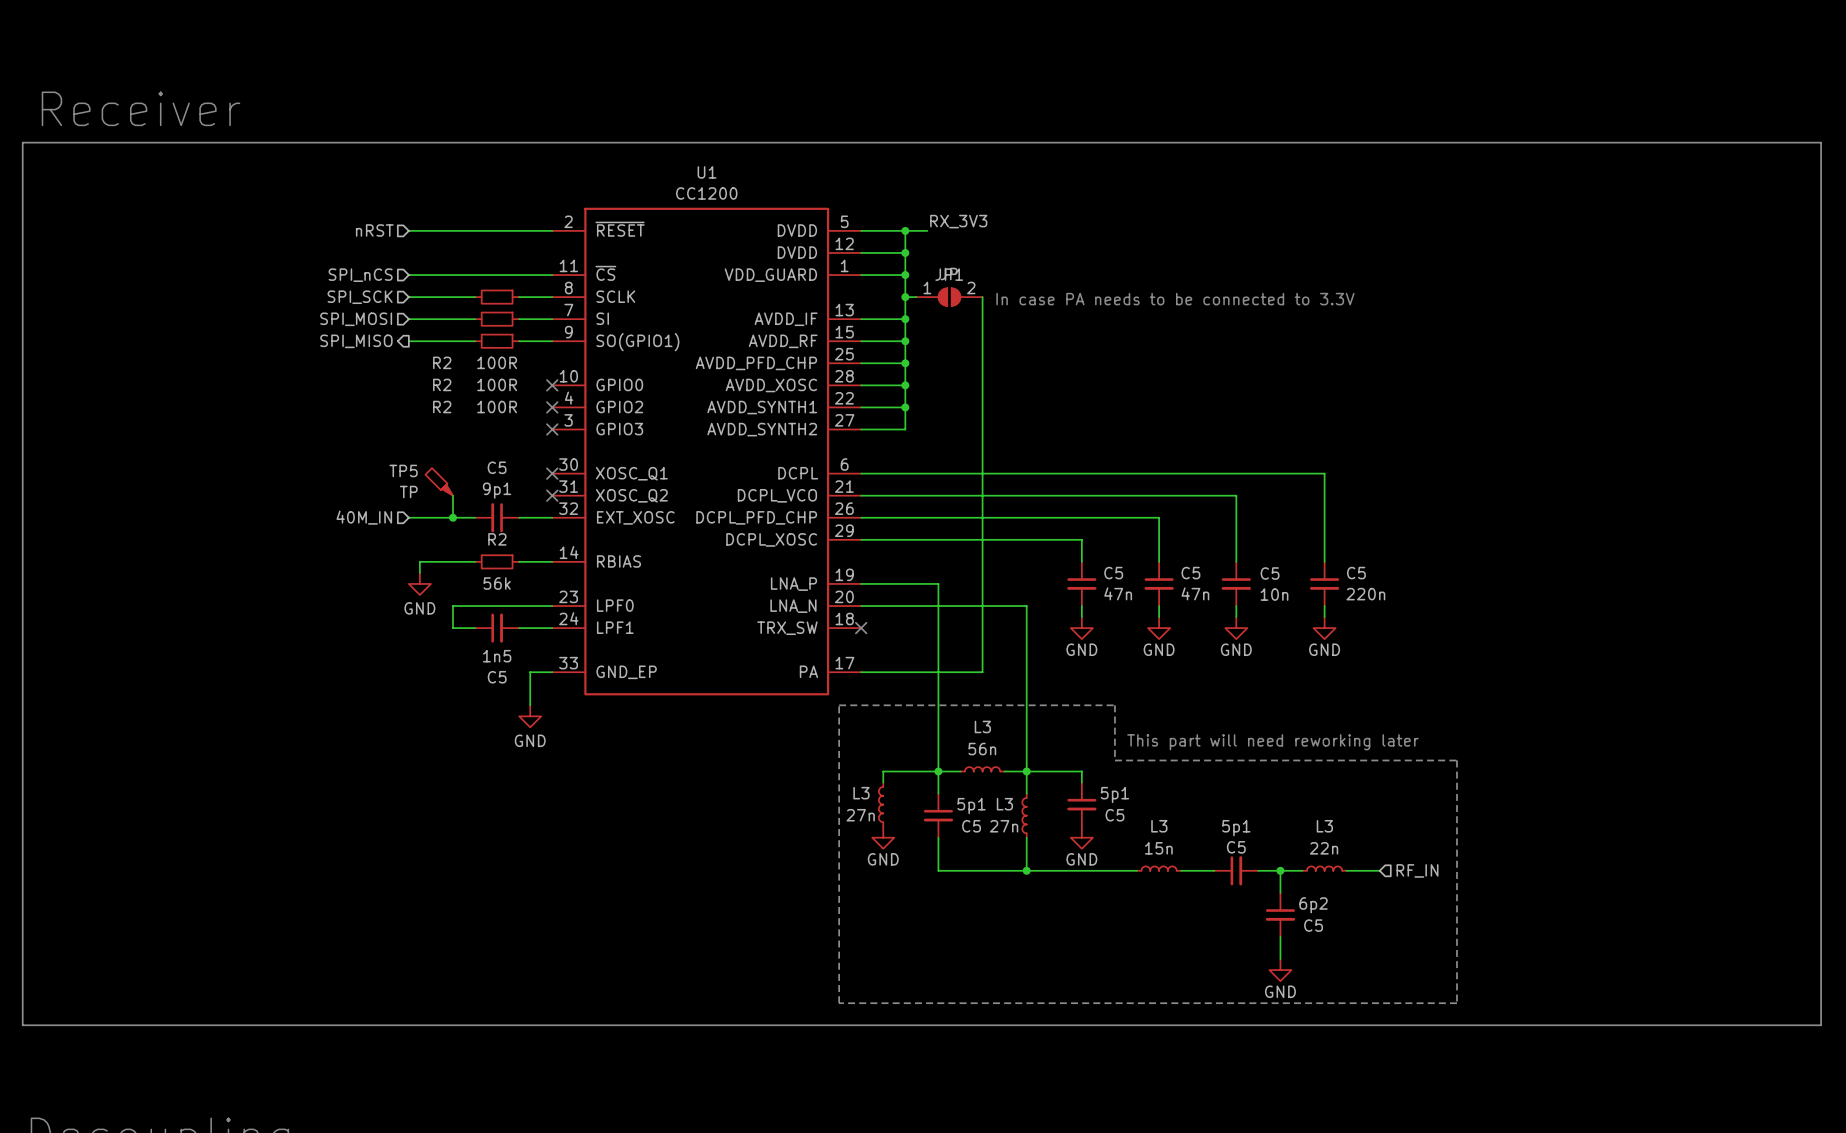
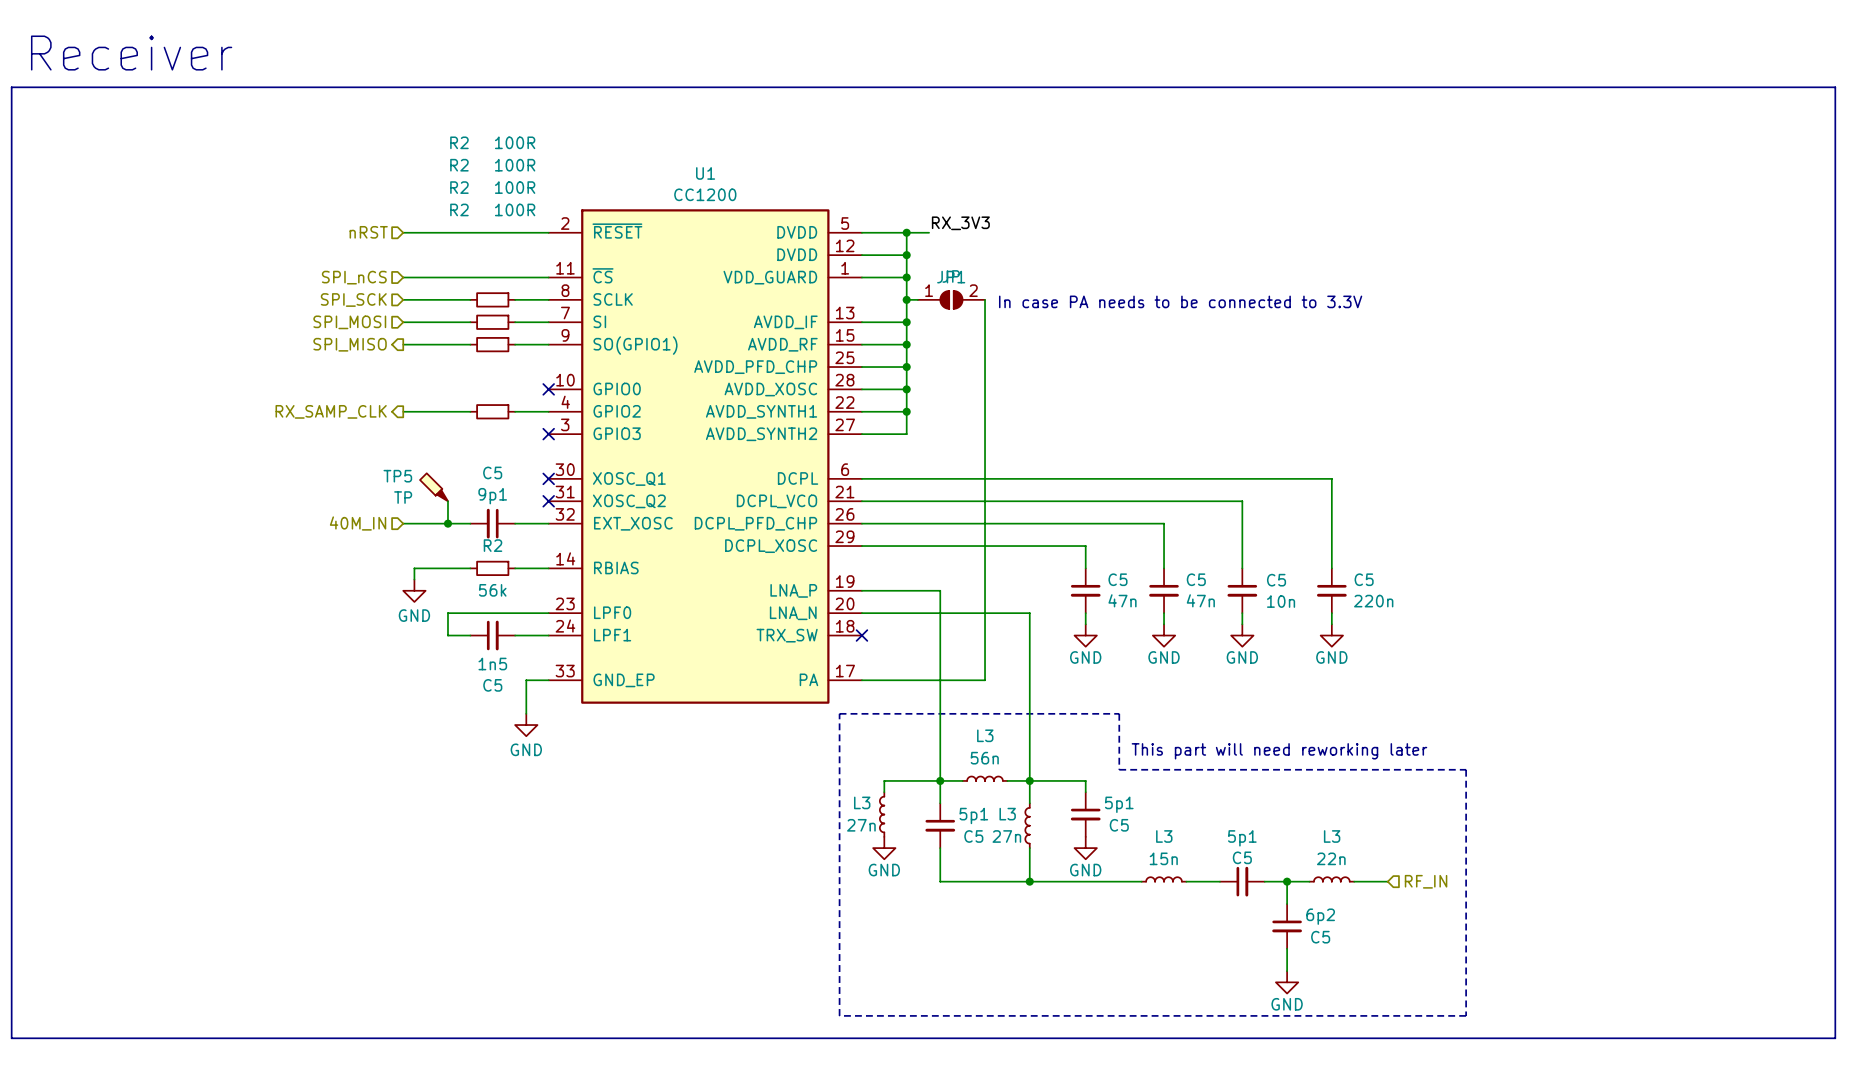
text position: Receiver (141, 108) -> Receiver (131, 53)
line: (22, 142) (1821, 142) -> (11, 143) (11, 87) (1835, 87) (1835, 143)
R2 name position: R2 (442, 362) -> R2 (459, 142)
R2 value position: 100R (497, 362) -> 100R (515, 142)
R2 name position: R2 (442, 384) -> R2 (459, 165)
R2 value position: 100R (497, 384) -> 100R (515, 165)
hierarchical label: none -> RX_SAMP_CLK (331, 411)
wire: none -> (403, 411) (470, 411)
R2 name position: R2 (442, 407) -> R2 (459, 187)
R2 value position: 100R (497, 407) -> 100R (515, 187)
R2: none -> 100R (492, 411)
wire: none -> (515, 411) (548, 411)
no-connect mark: (552, 407) -> none

